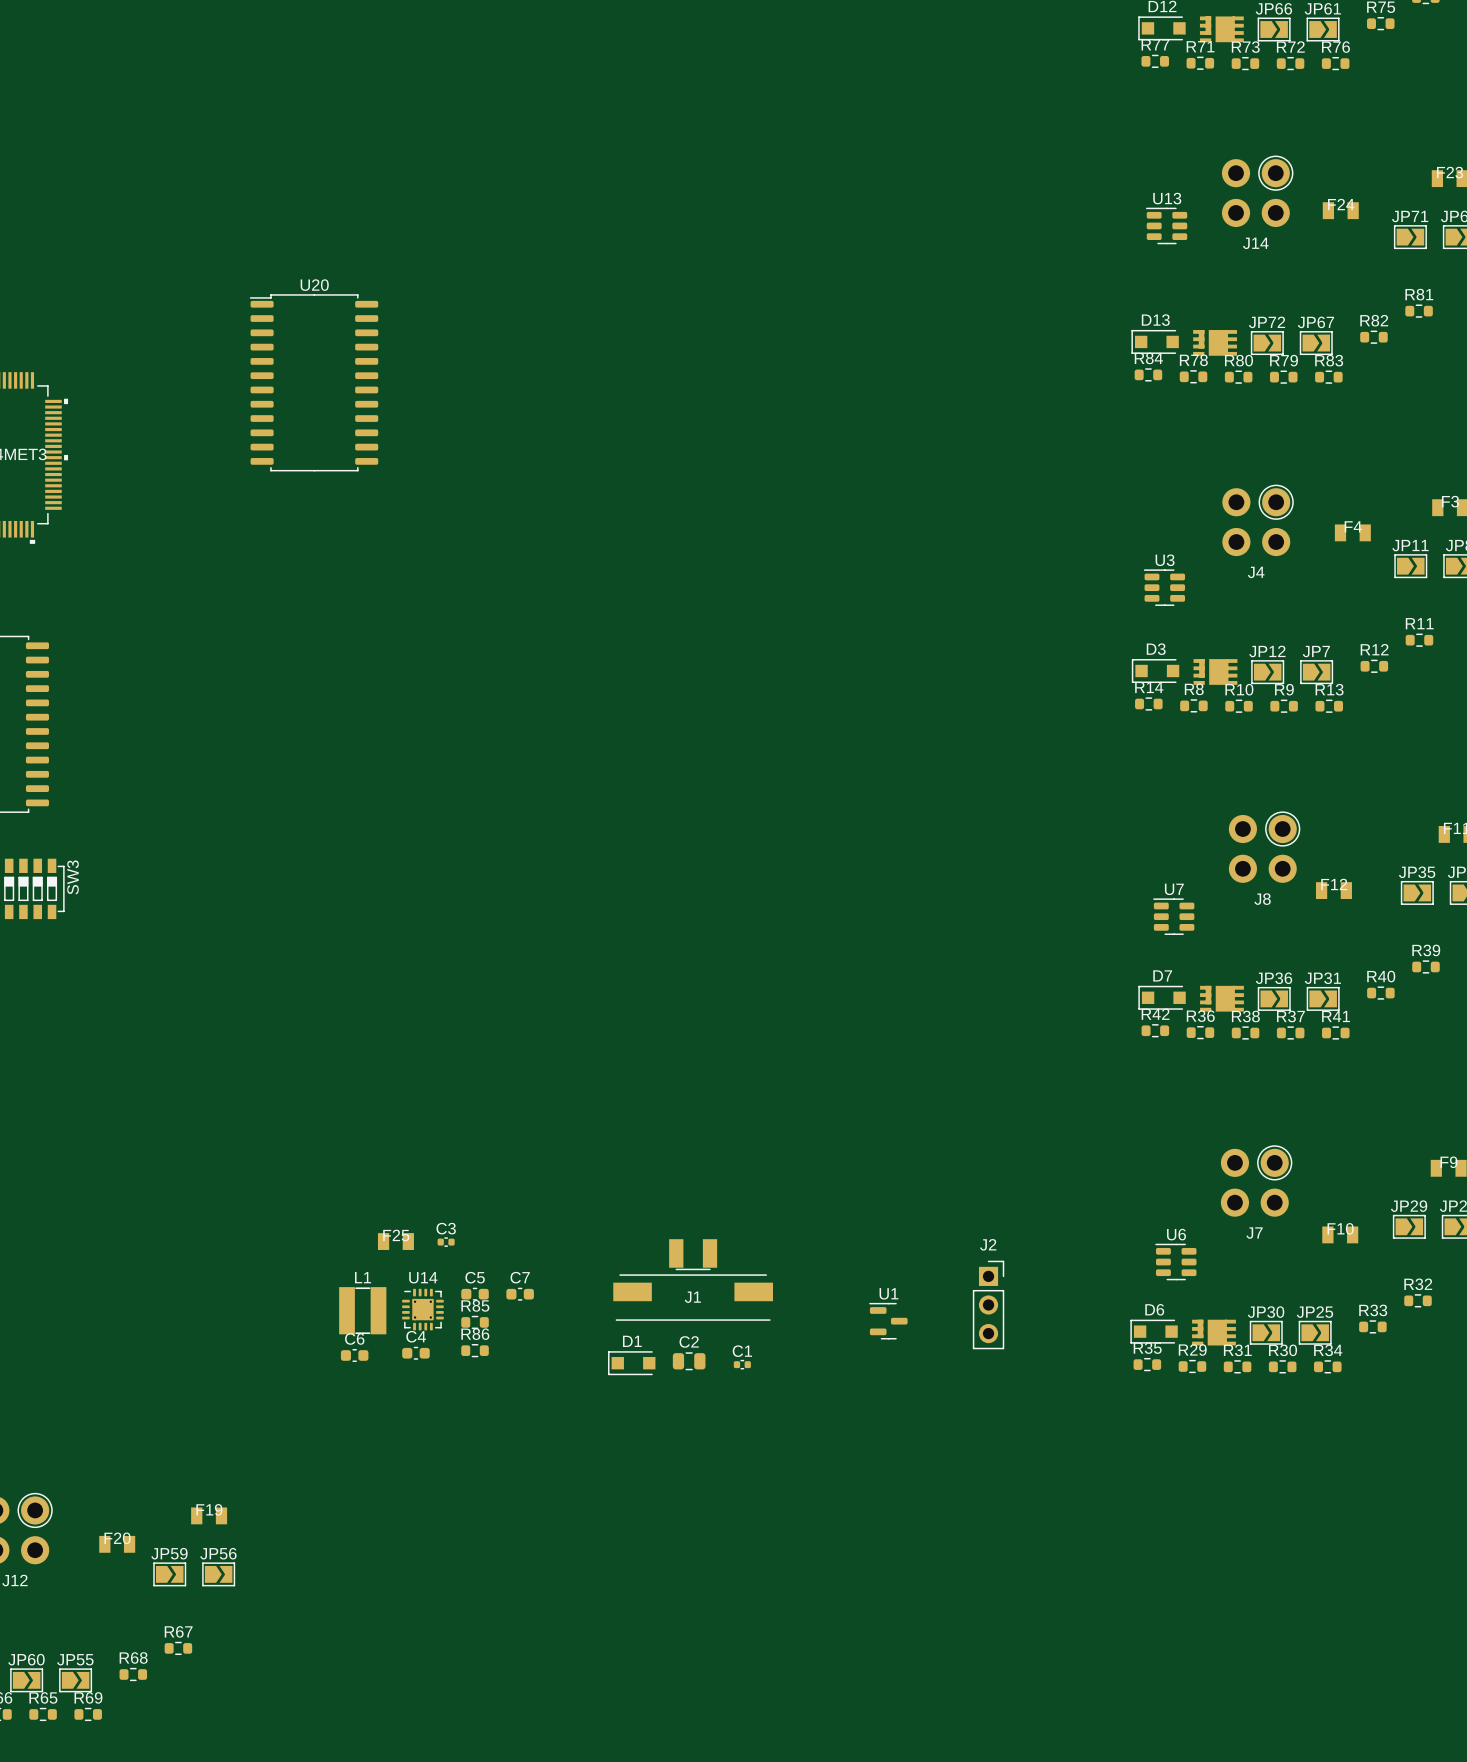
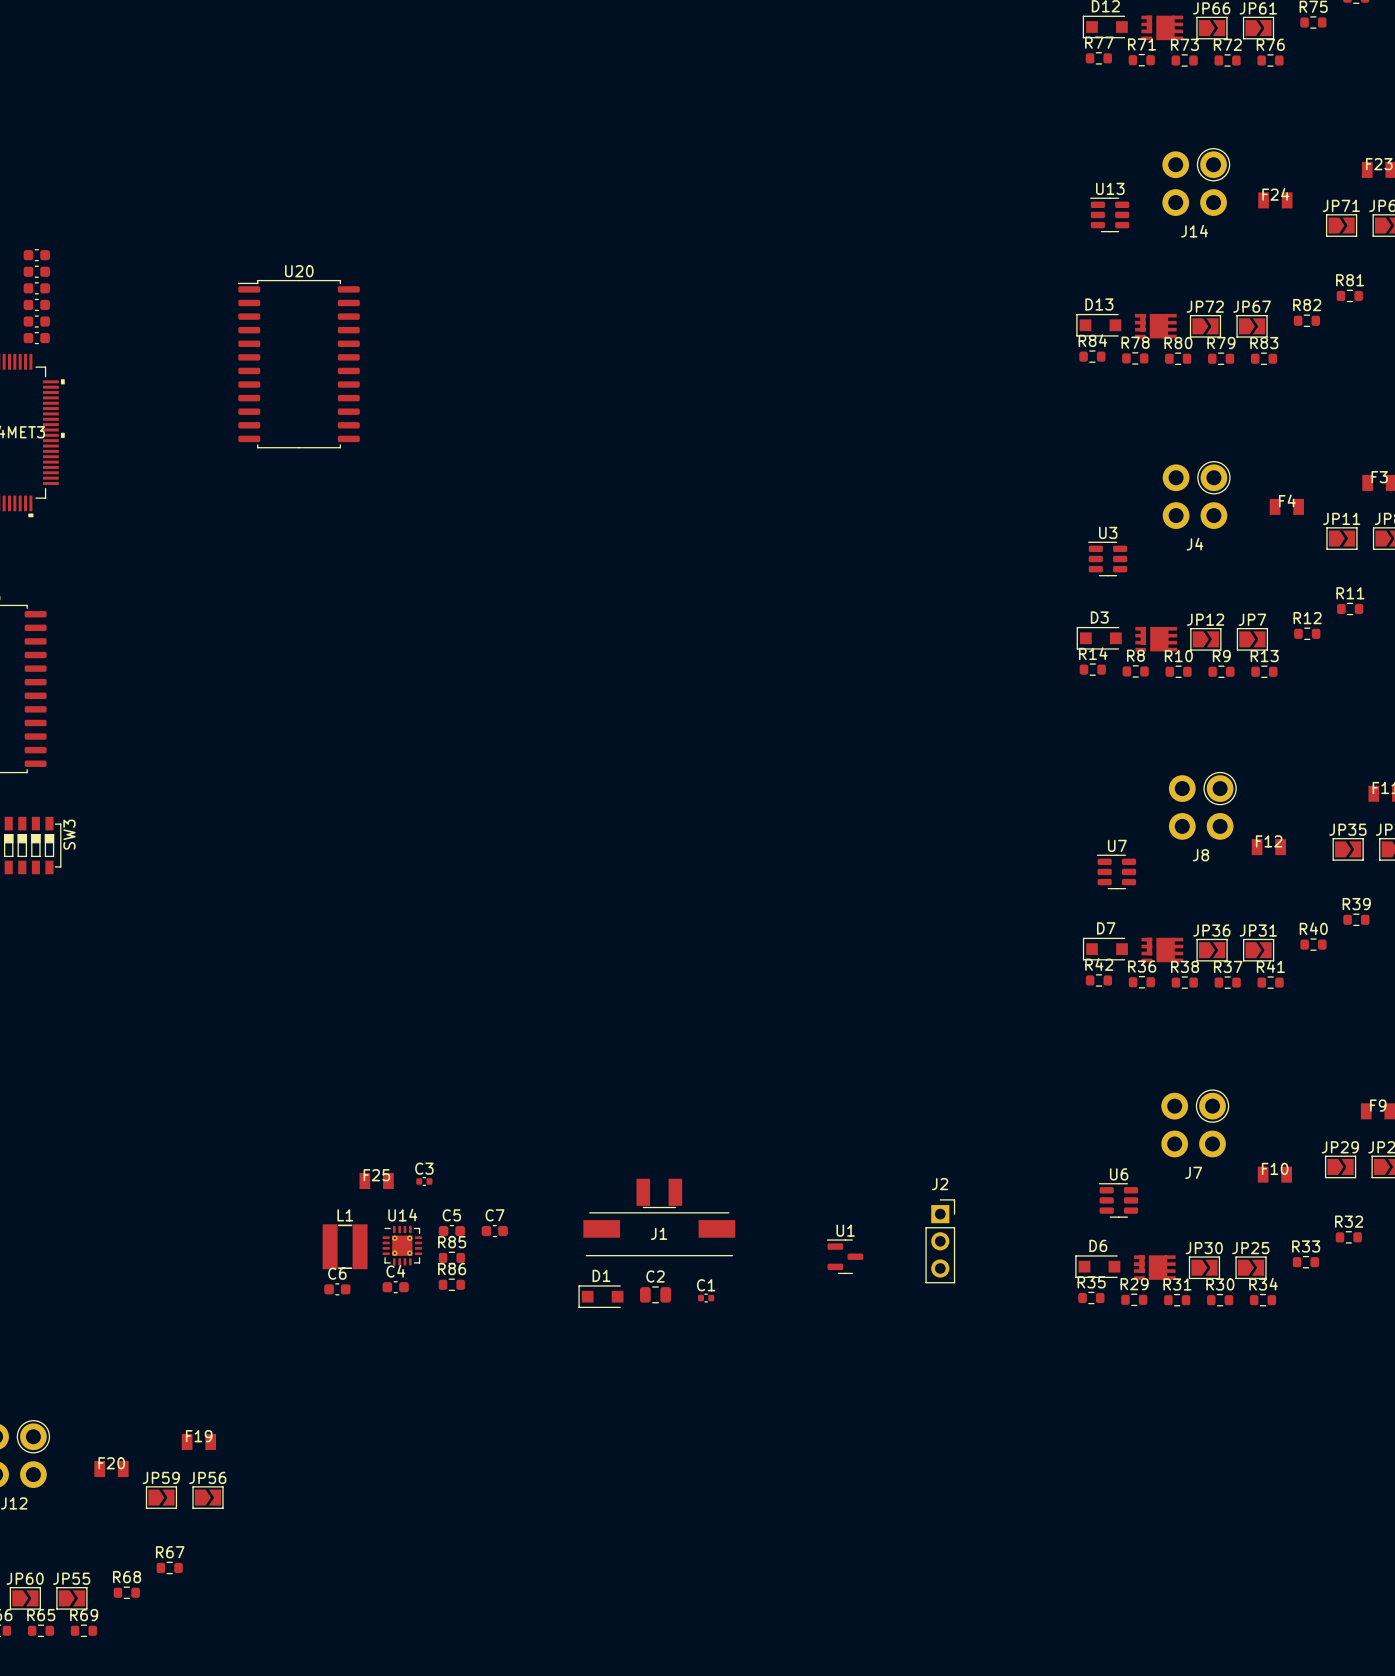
part: none -> (36, 255)
part: none -> (36, 271)
part: none -> (36, 288)
part: none -> (36, 304)
part: none -> (36, 321)
part: none -> (36, 338)

